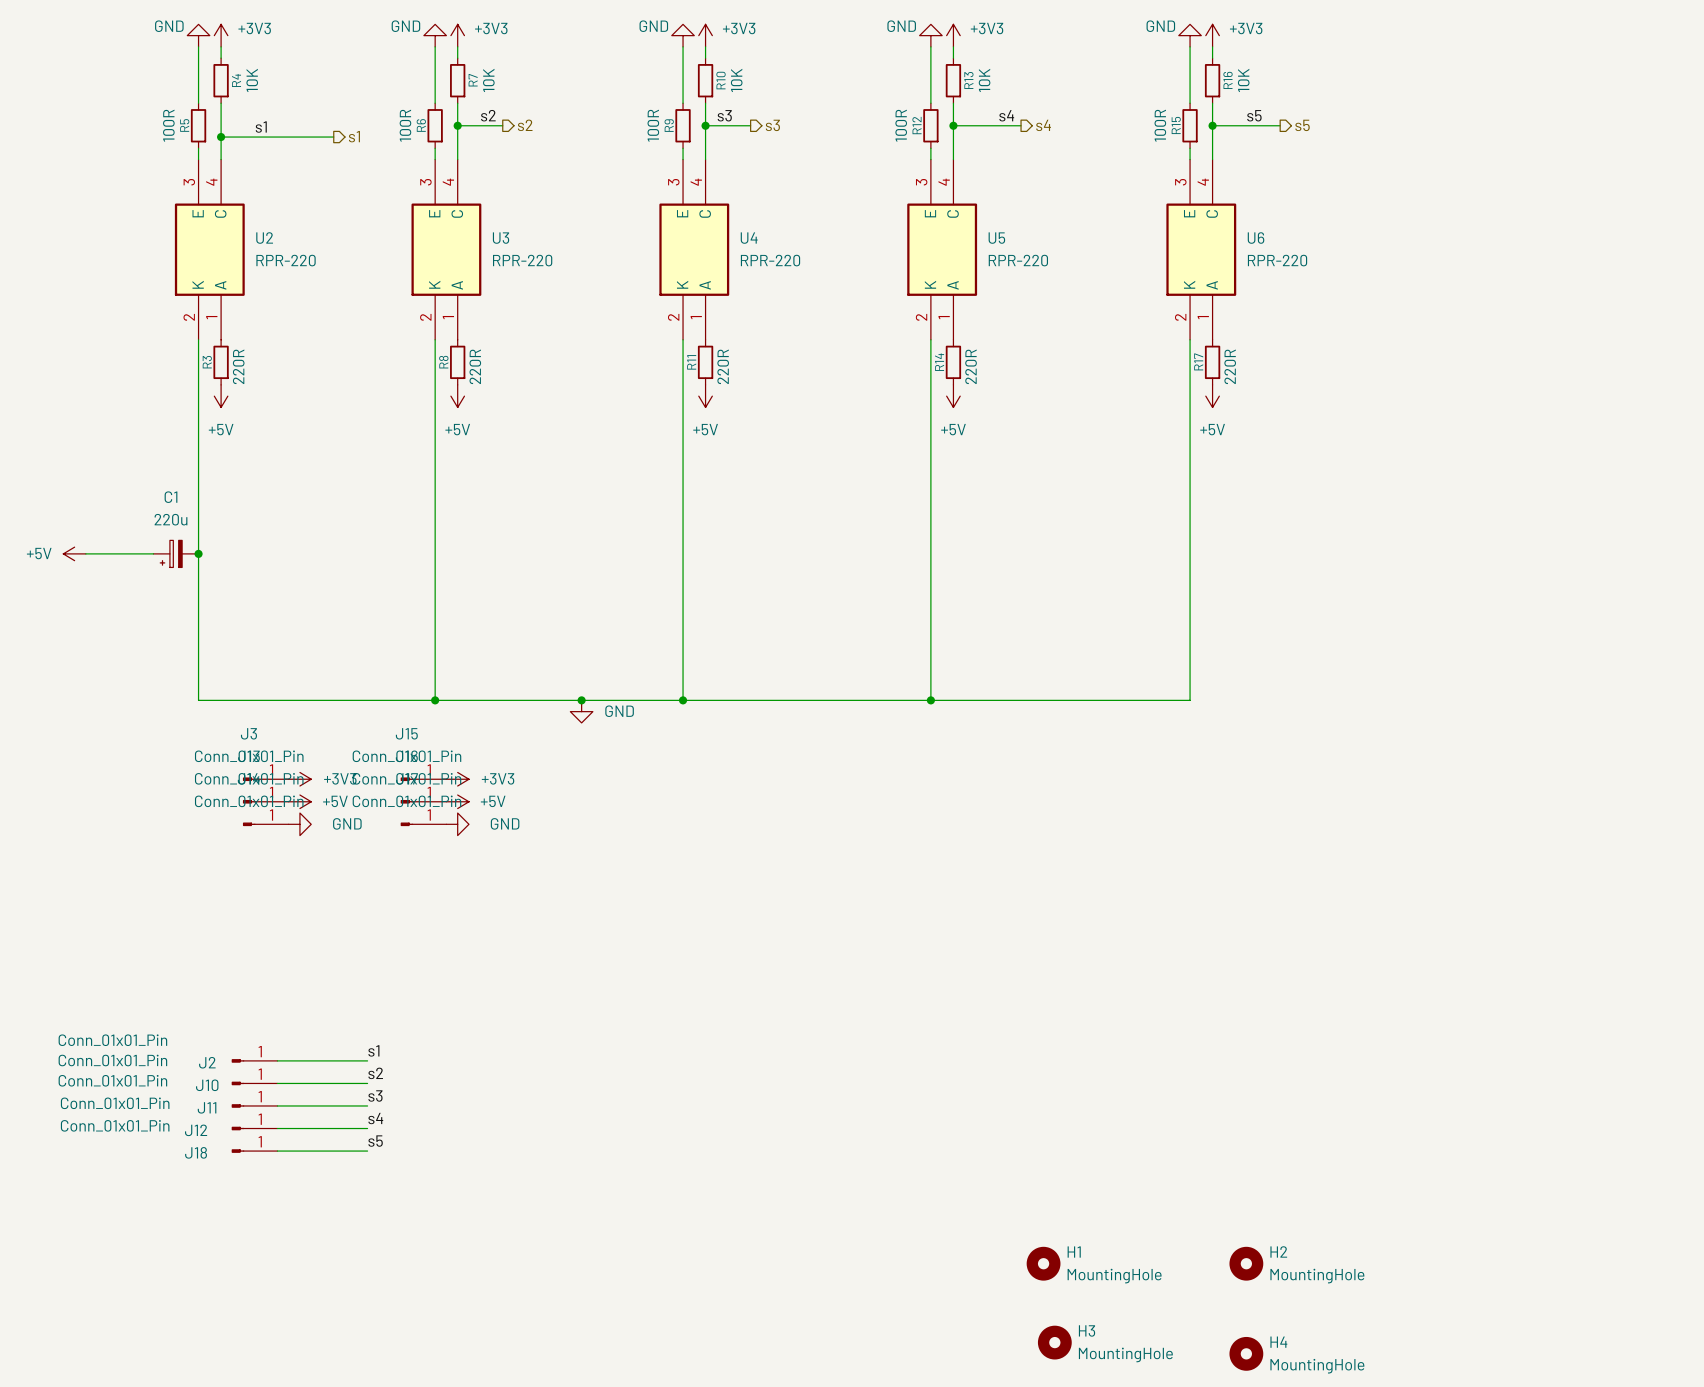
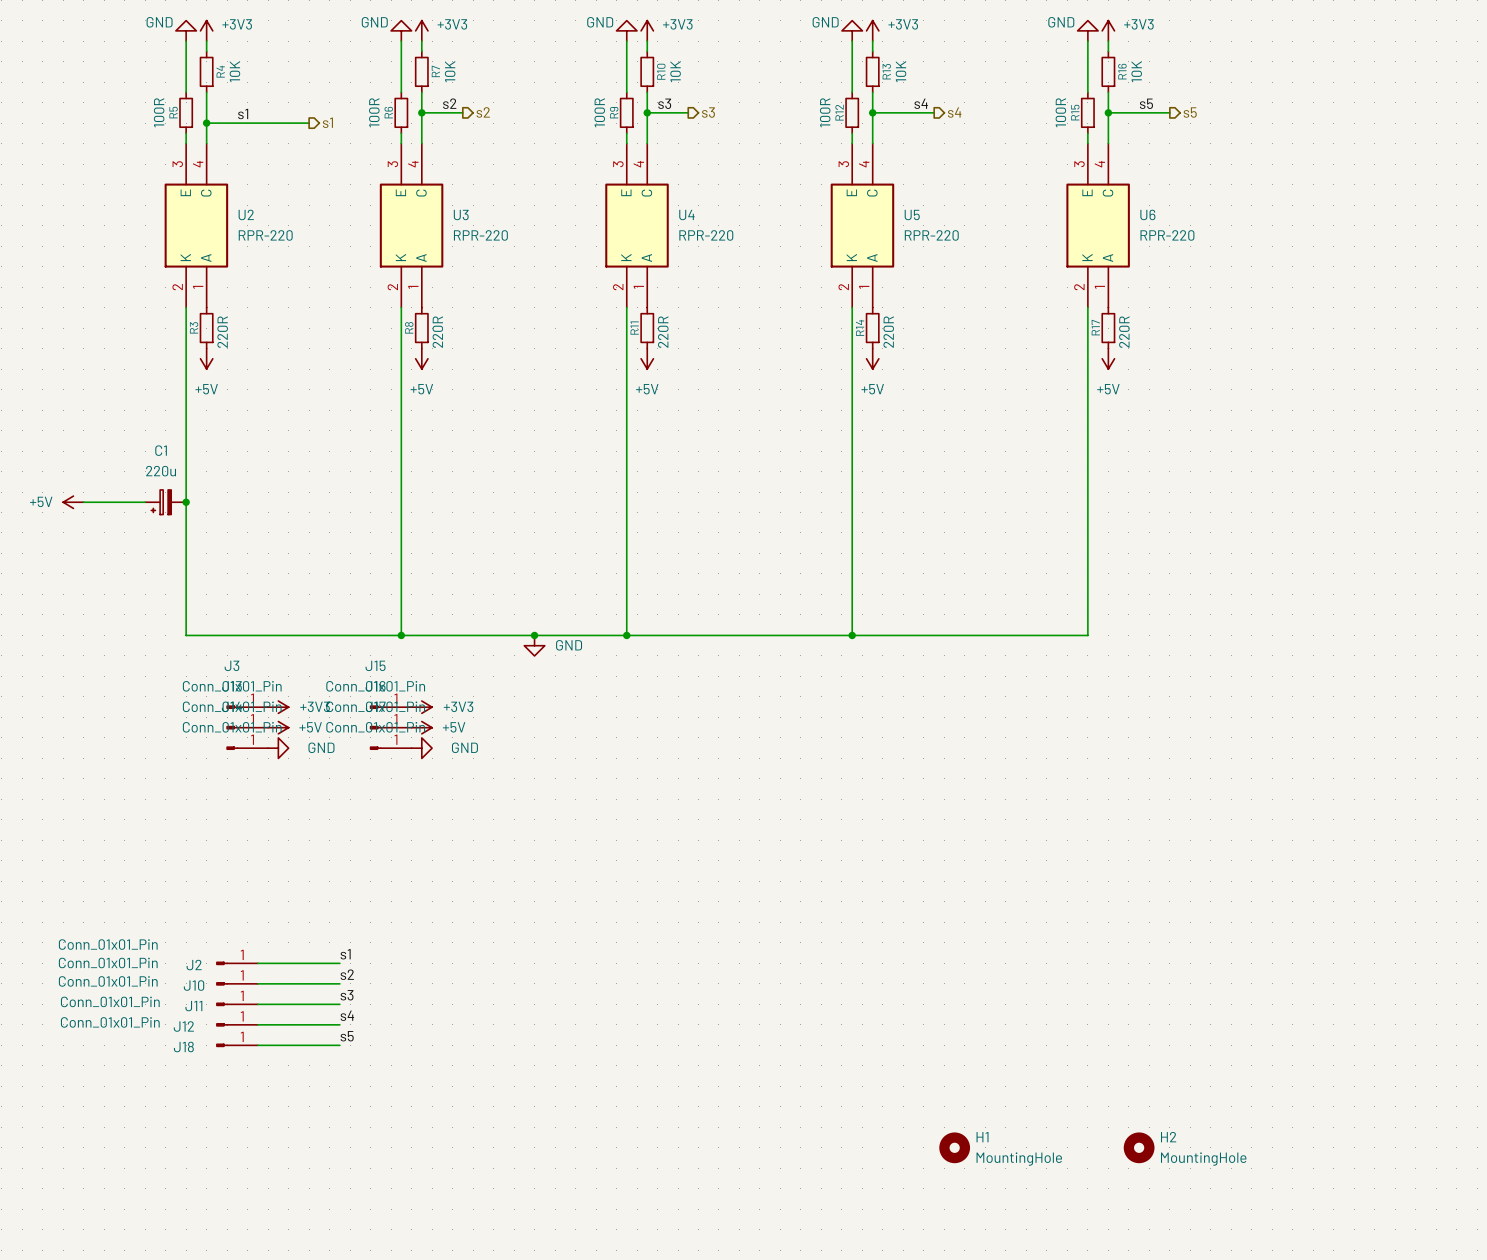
H3: MountingHole (1054, 1342) -> none
H4: MountingHole (1246, 1353) -> none

